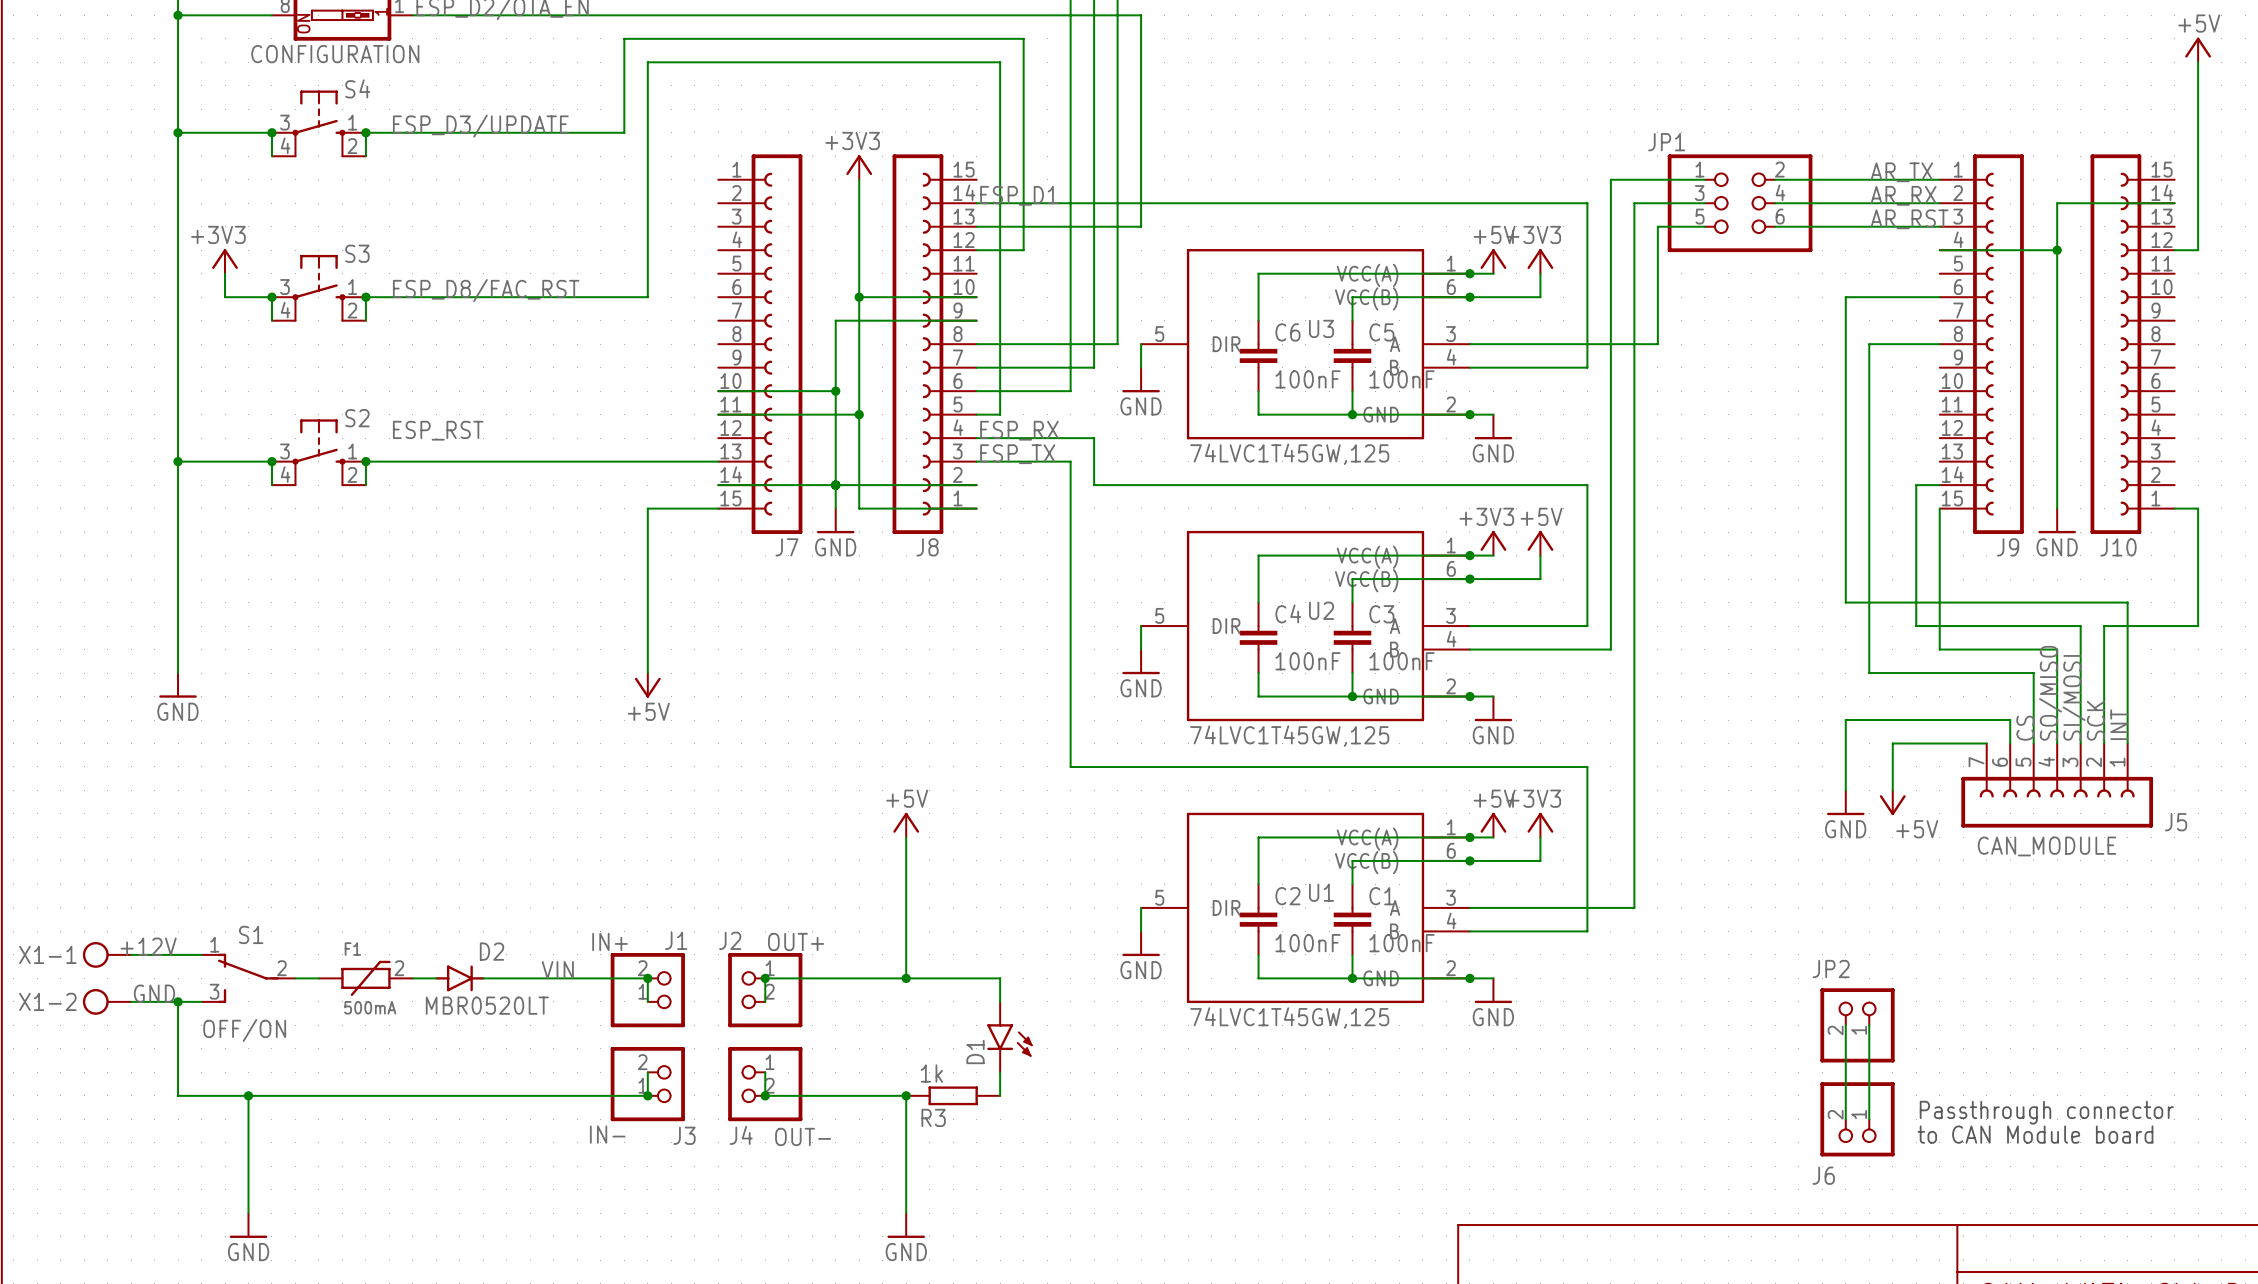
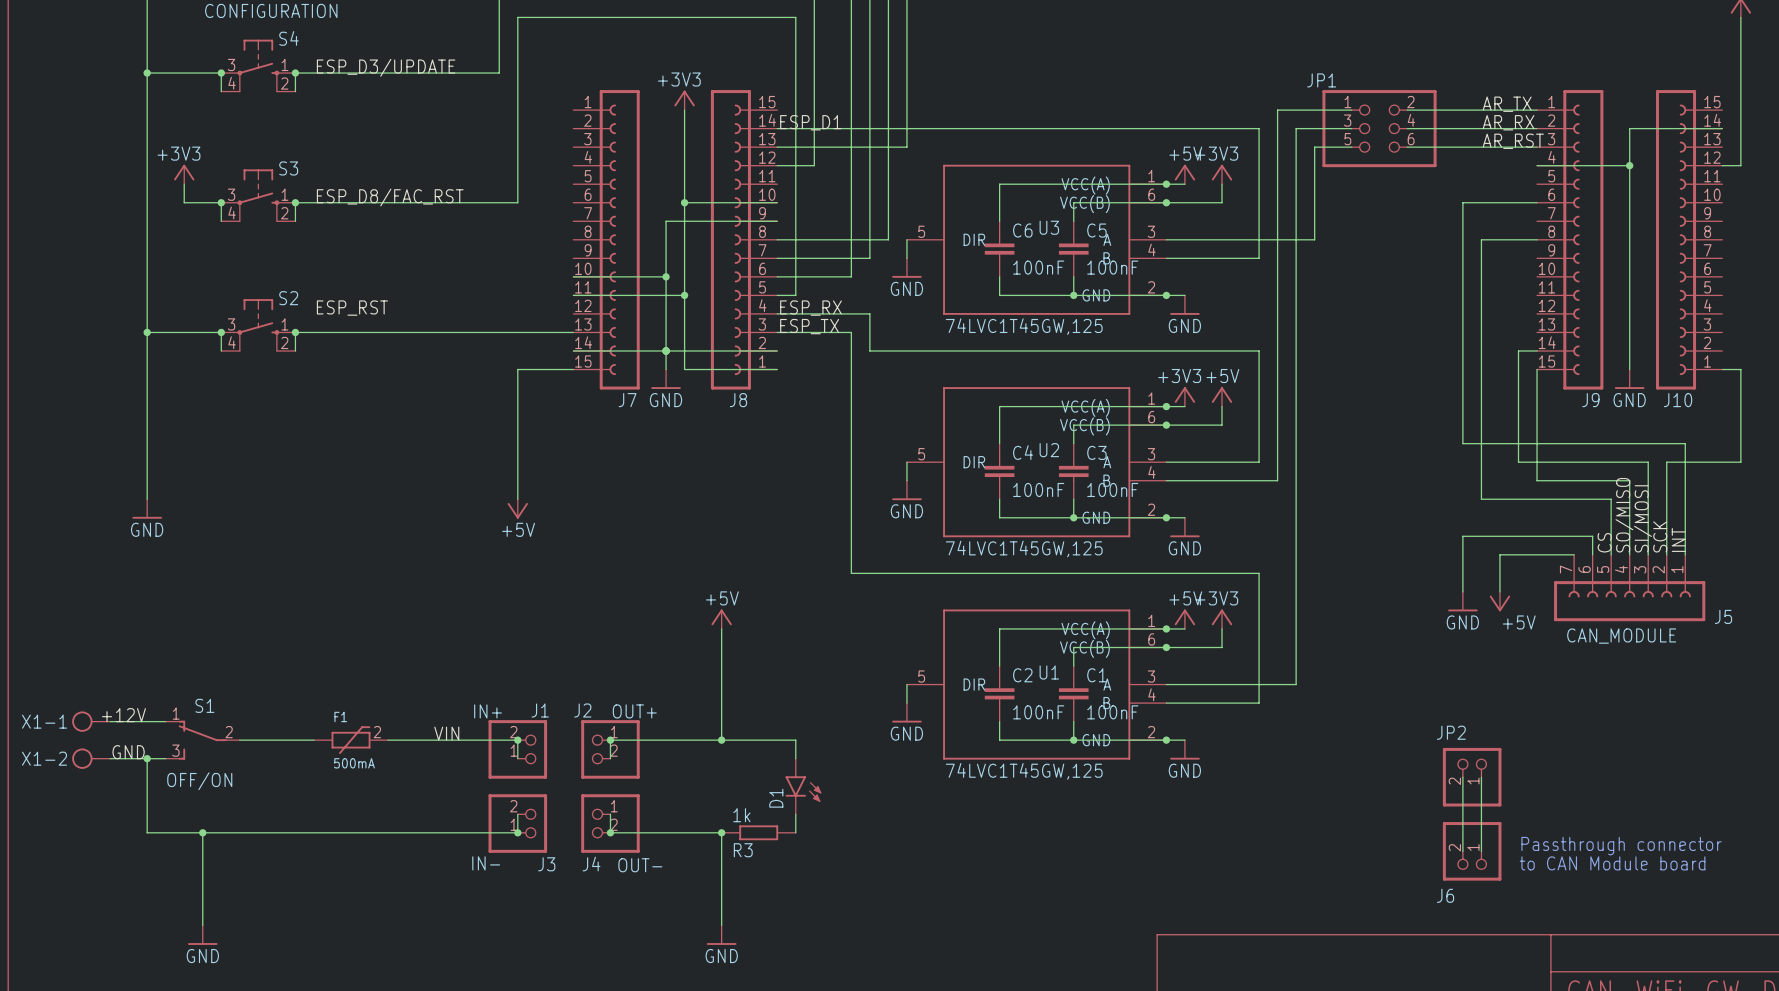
wire: none -> (258, 740) (313, 740)
F1 position: (365, 978) -> (351, 740)
wire: (412, 978) (436, 978) -> none
D2: MBR0520LT (459, 978) -> none

